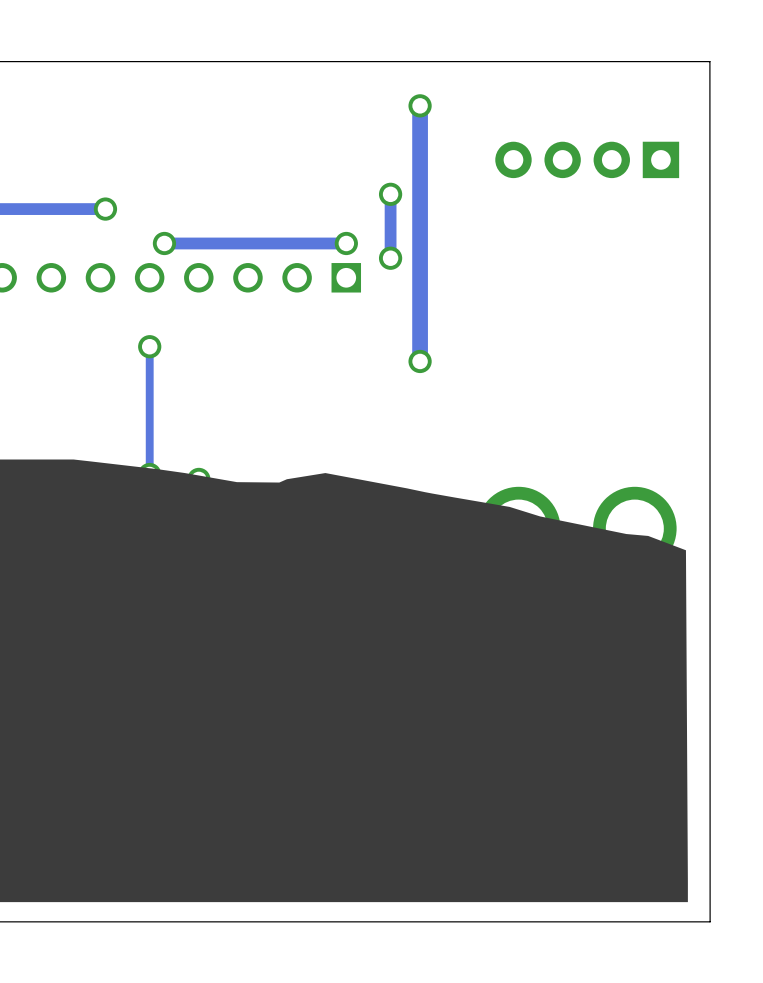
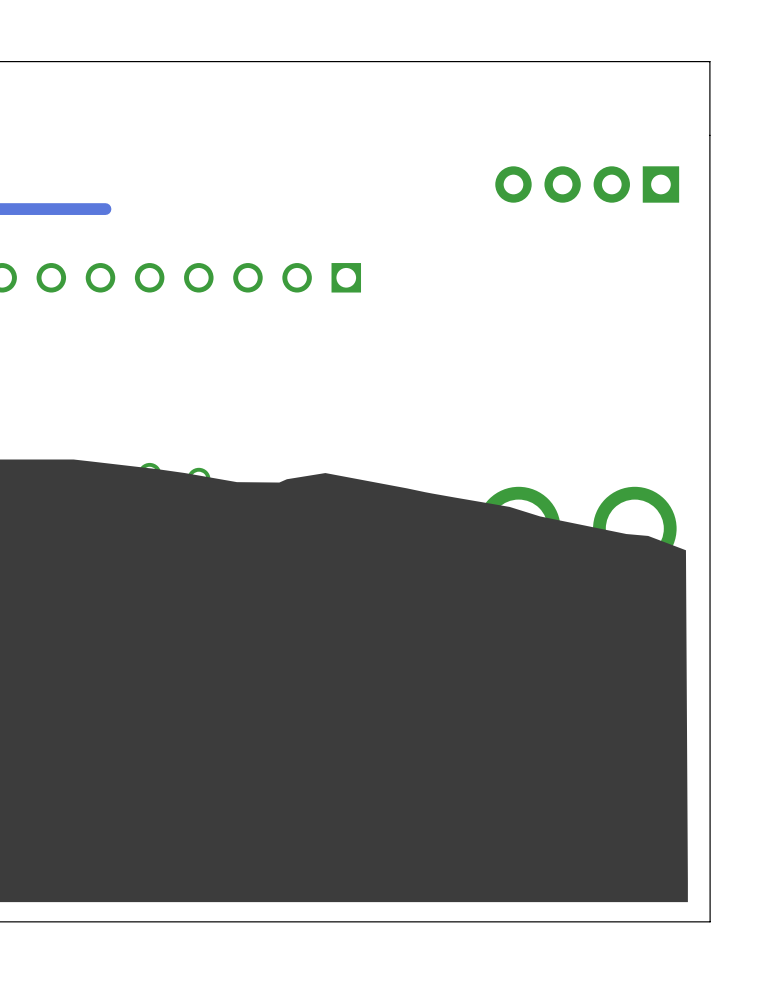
track: (420, 105) (420, 361) -> none
via: (420, 105) -> none
part position: (587, 159) -> (587, 184)
track: (390, 194) (390, 258) -> none
via: (390, 194) -> none
via: (105, 209) -> none
via: (164, 243) -> none
track: (346, 243) (164, 243) -> none
via: (346, 243) -> none
via: (390, 258) -> none
track: (149, 346) (149, 474) -> none
via: (149, 346) -> none
via: (420, 361) -> none

